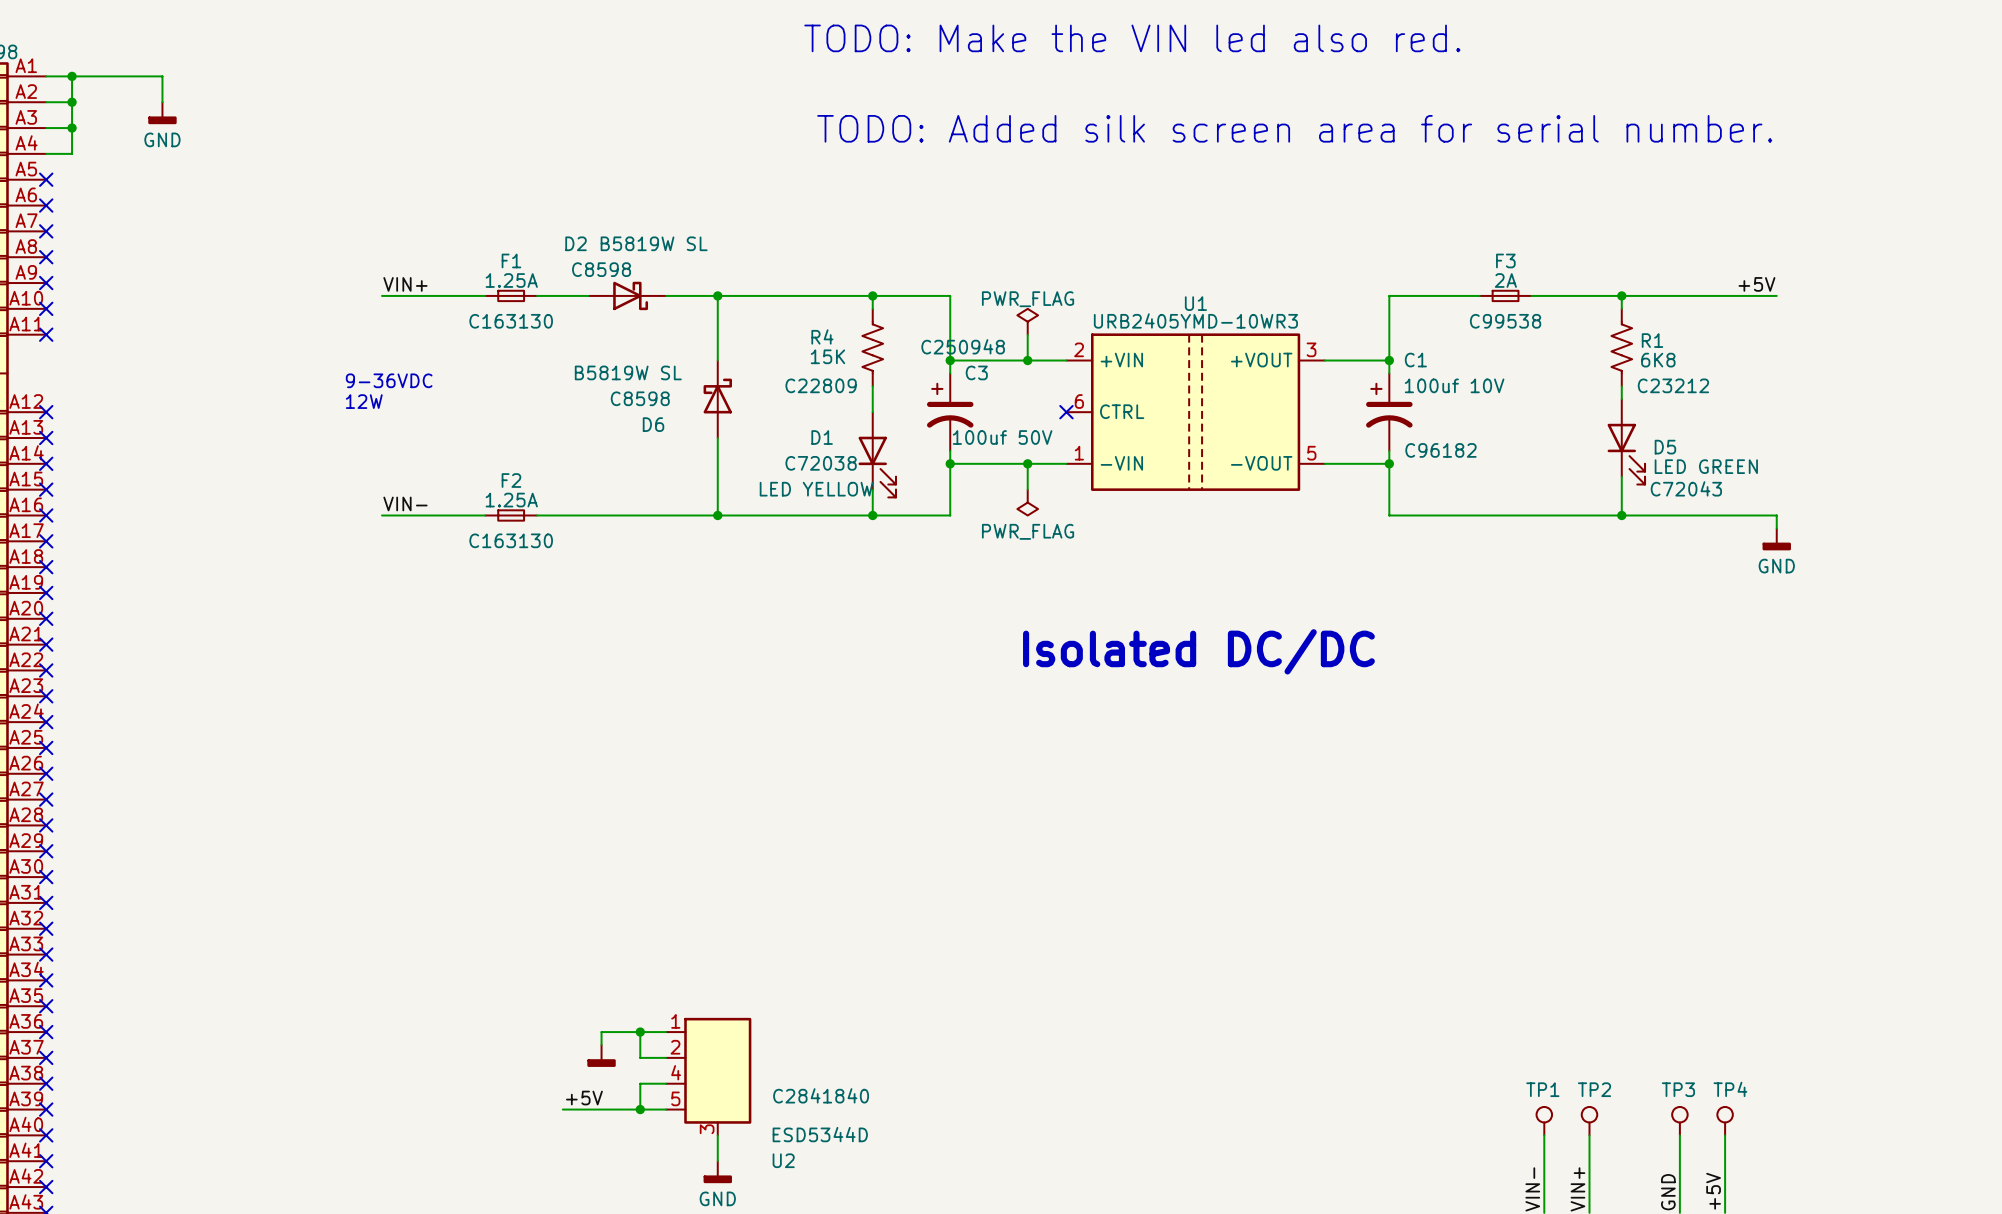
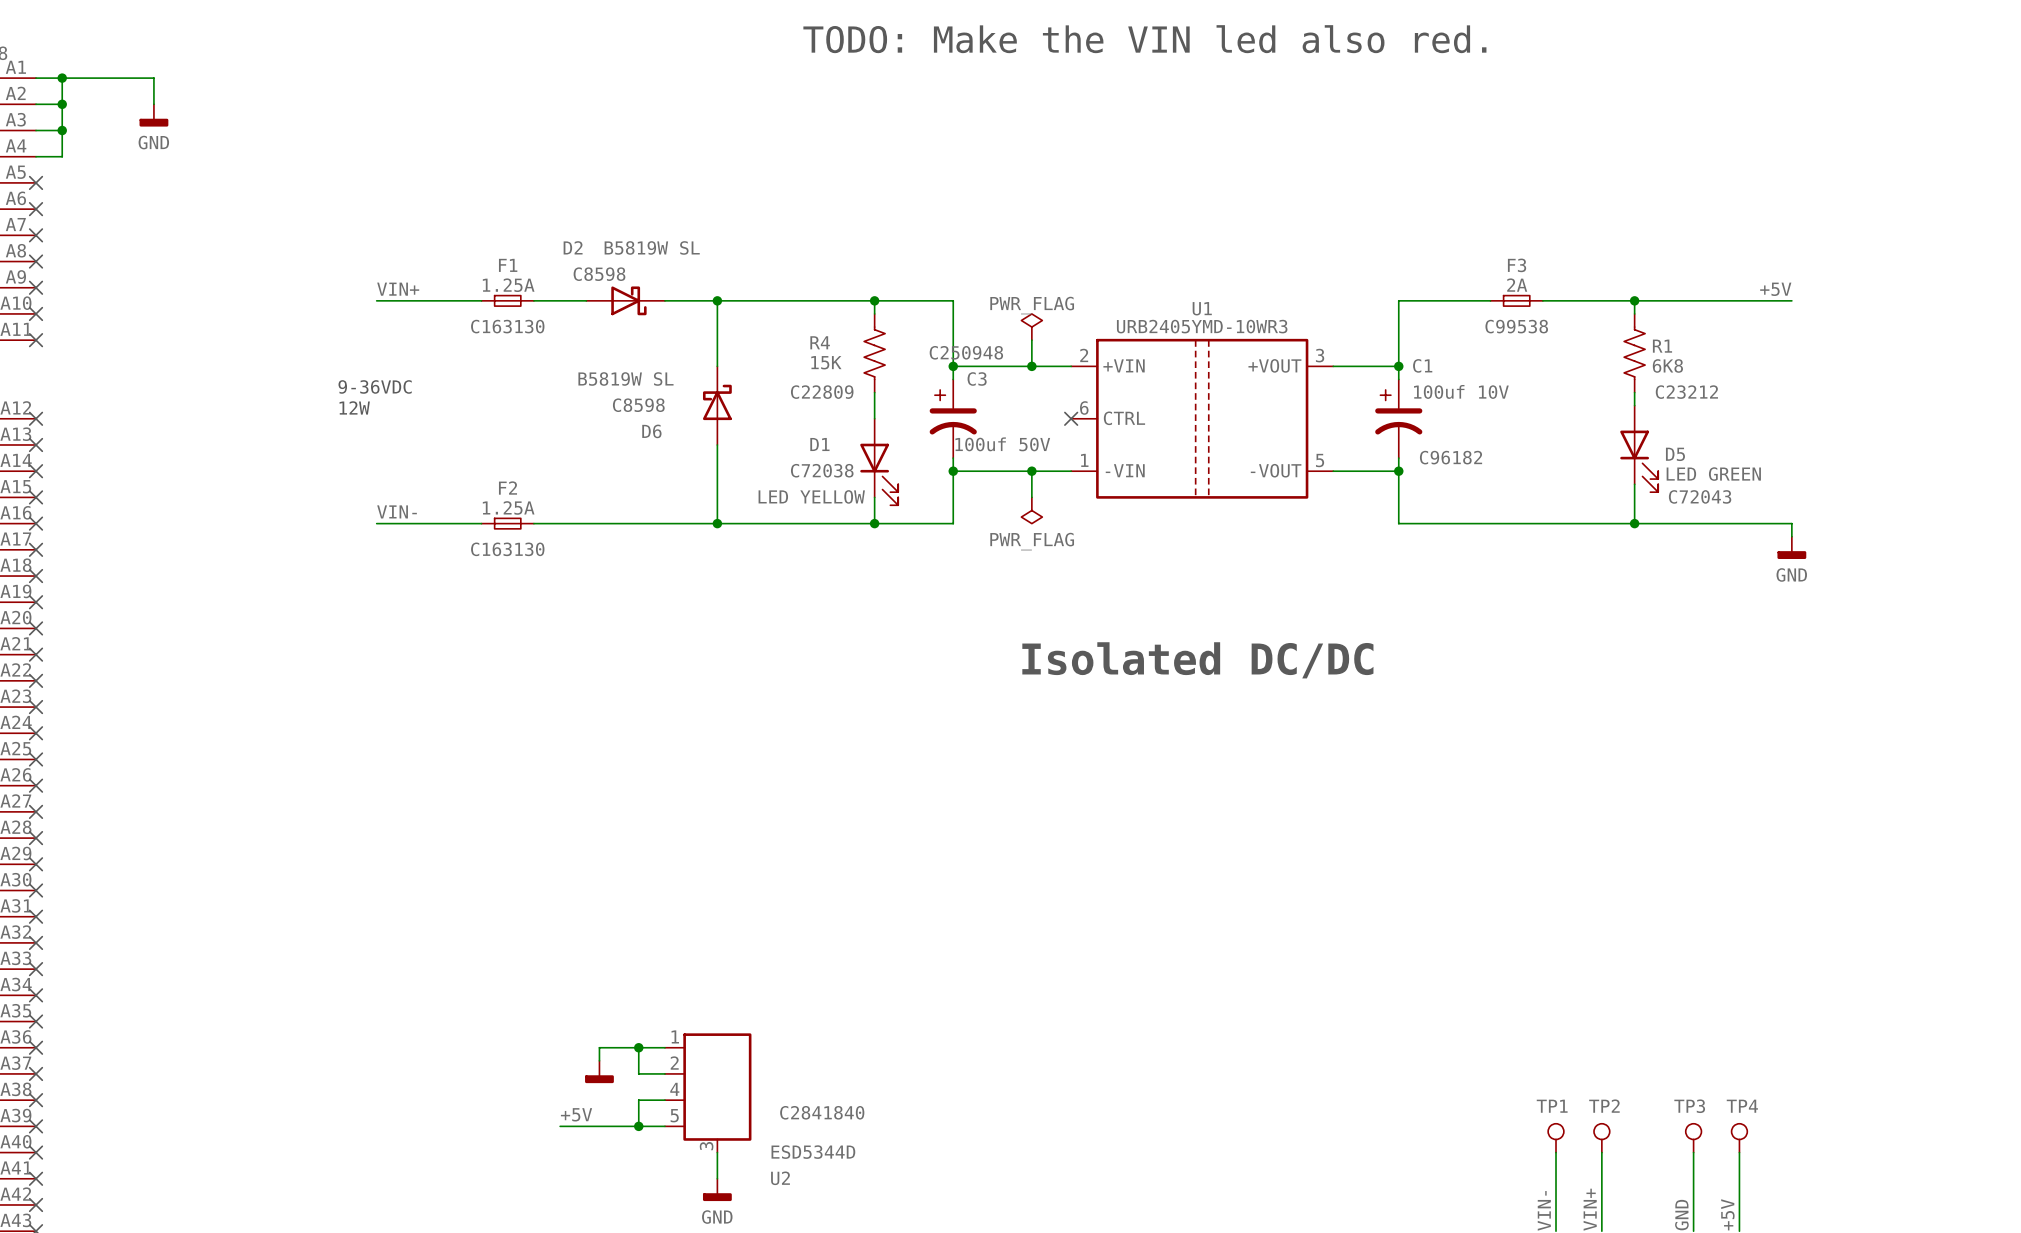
text: TODO: Added silk screen area for serial number. (1294, 128) -> none

